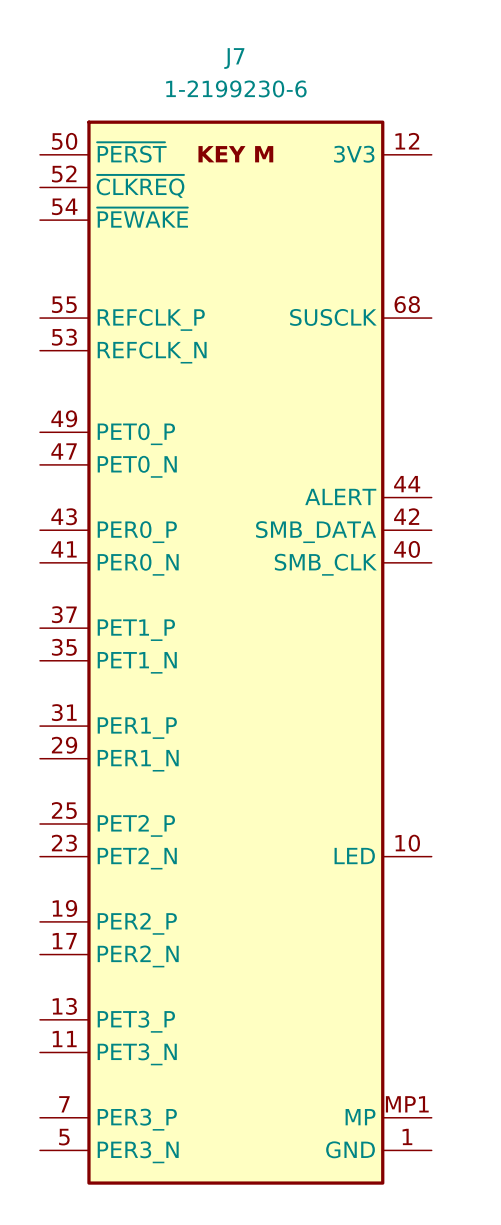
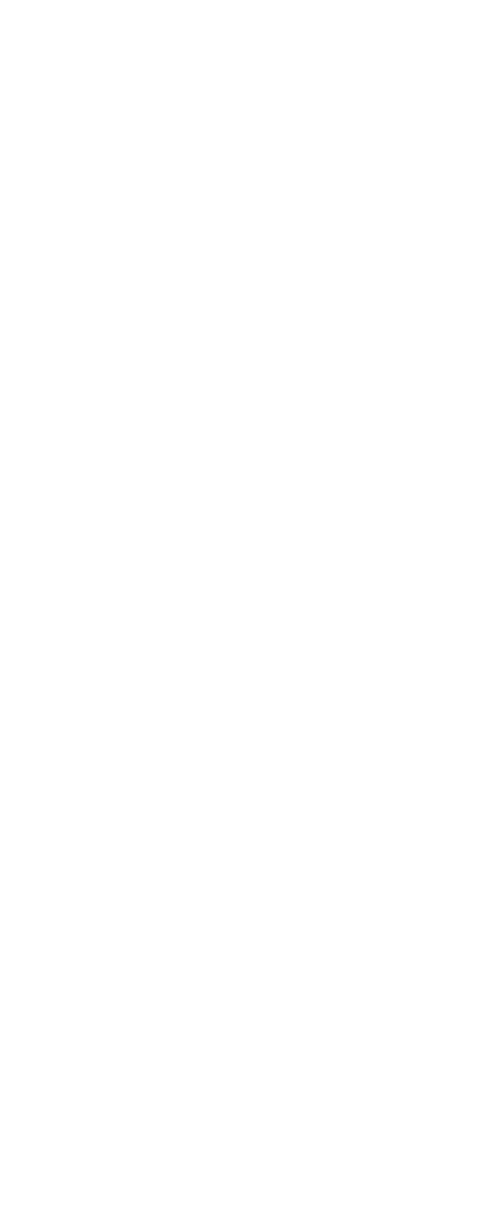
J7: (235, 652) -> none

